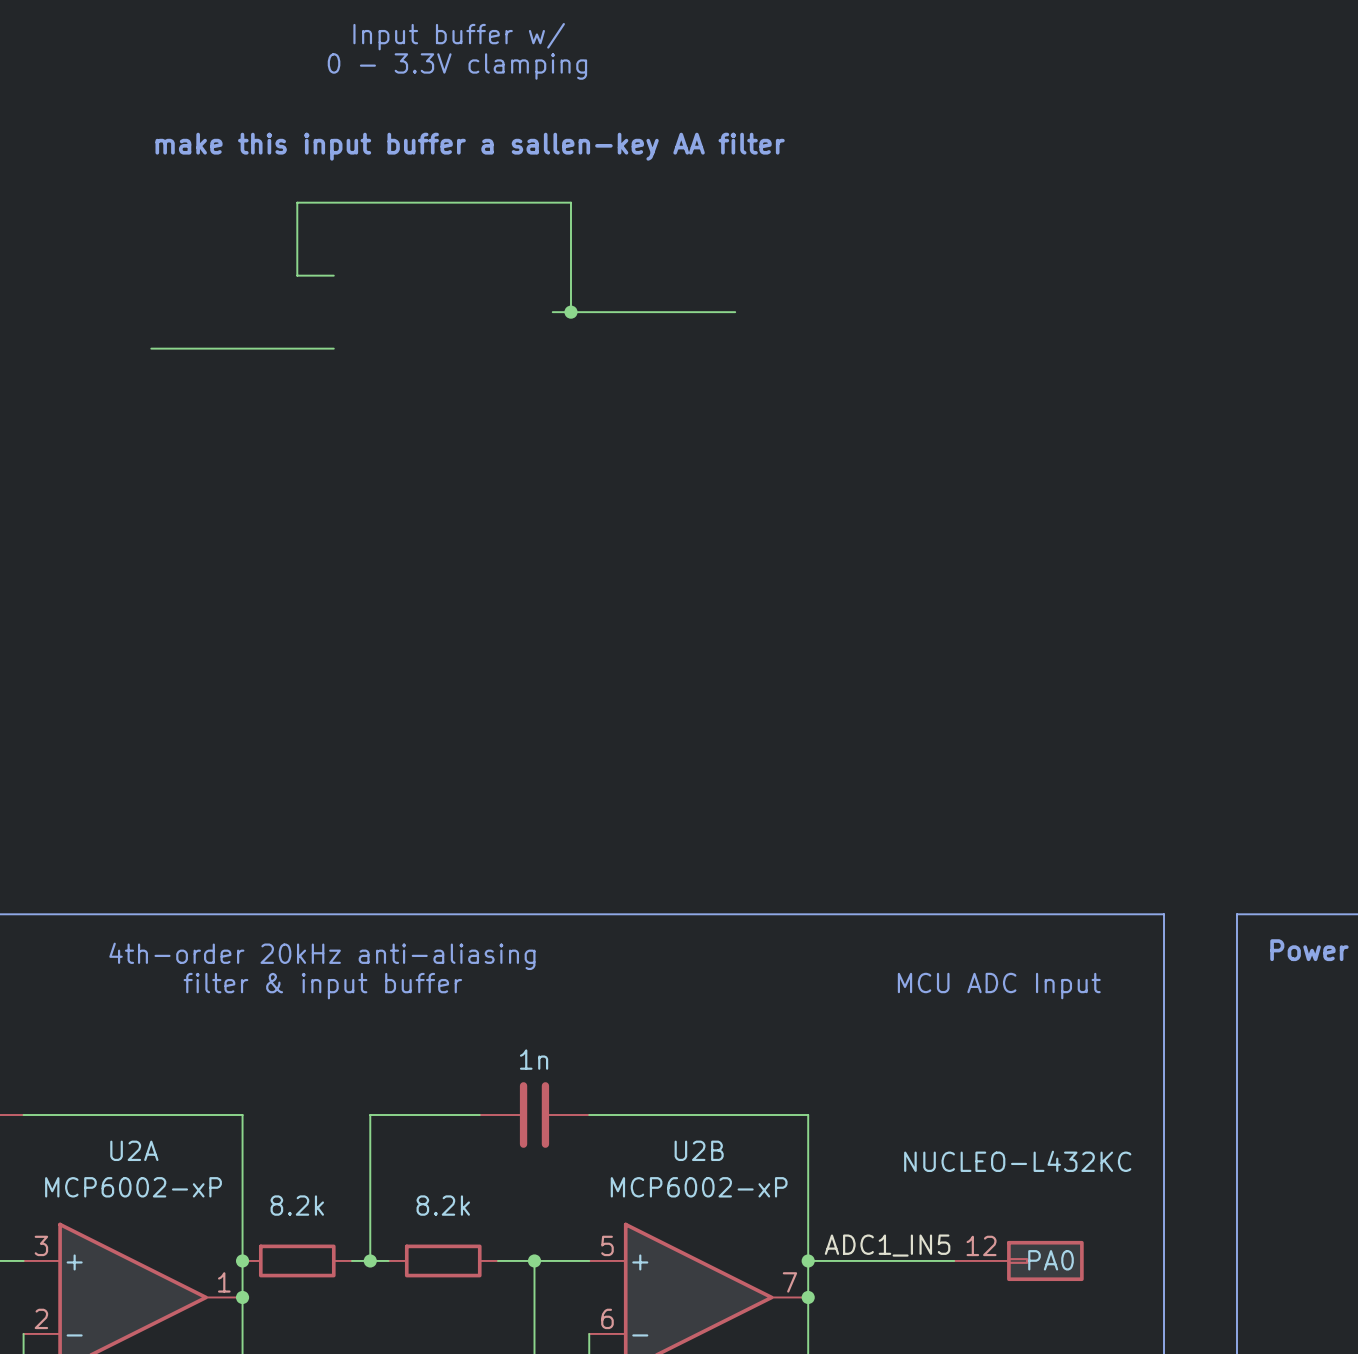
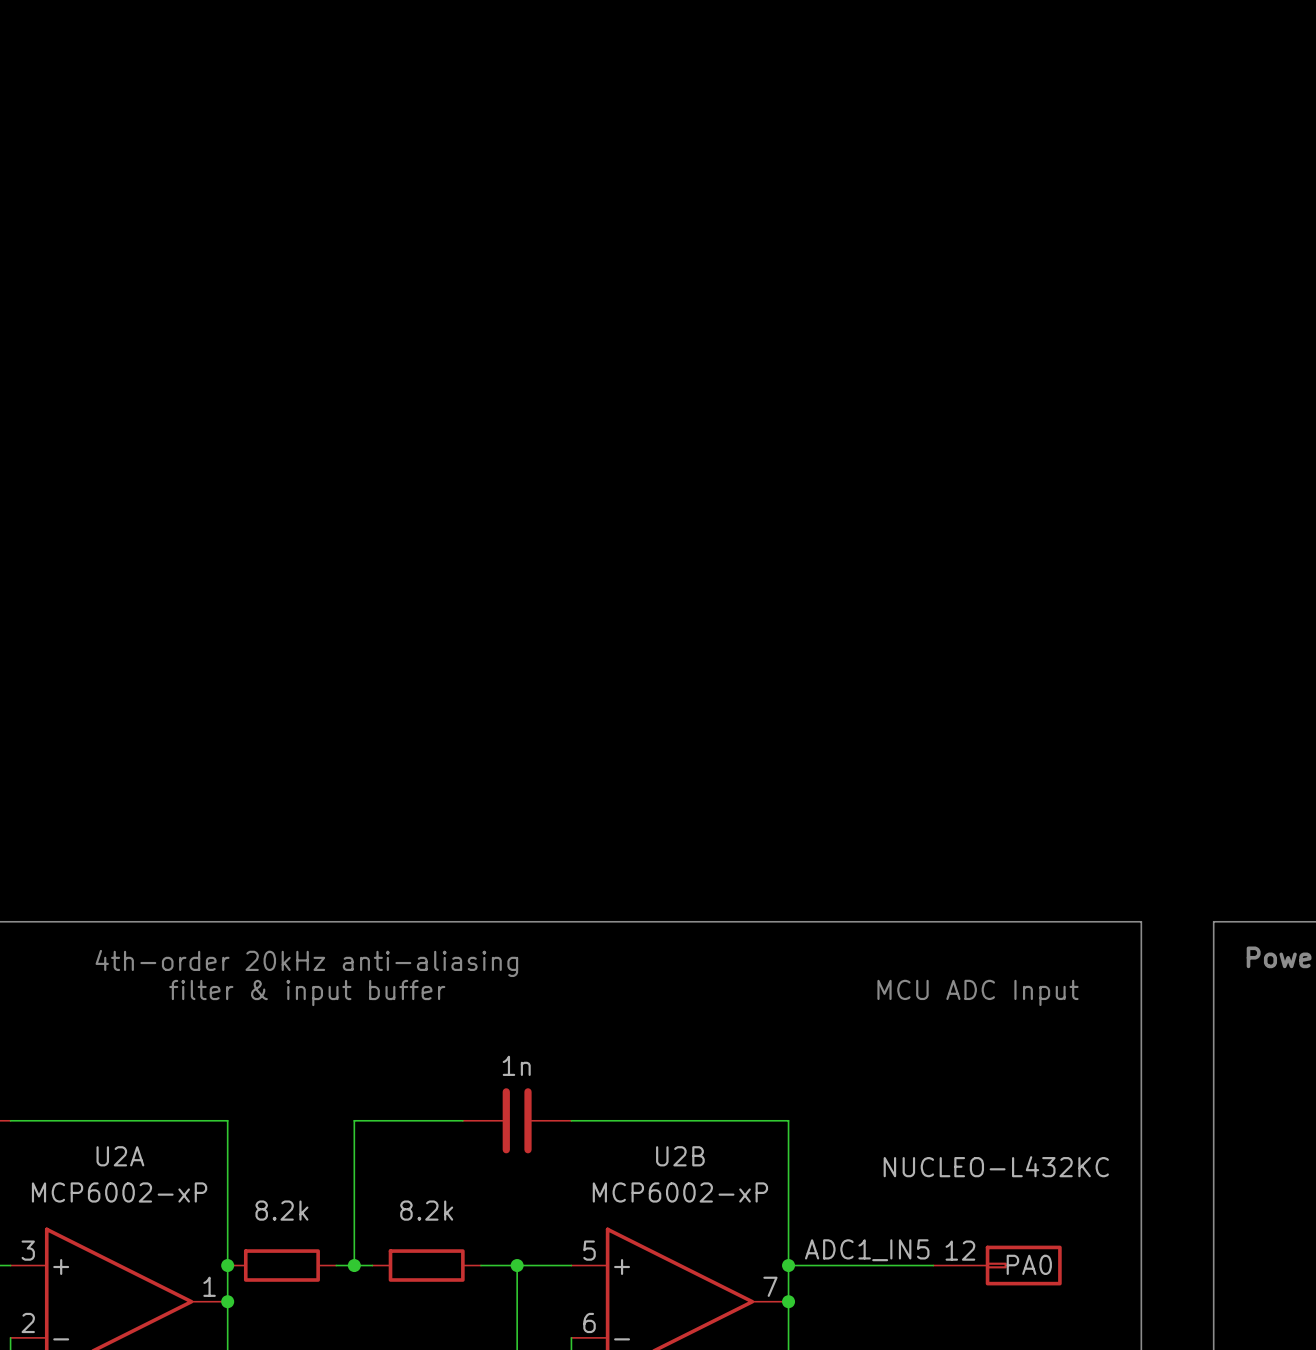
text: Input buffer w/ (459, 36) -> none
text: 0 - 3.3V clamping (457, 66) -> none
text: make this input buffer a sallen-key AA filter (470, 146) -> none
wire: (333, 275) (297, 275) (297, 202) (570, 202) (570, 312) -> none
wire: (552, 312) (735, 312) -> none
junction: (570, 312) -> none
wire: (151, 348) (333, 348) -> none

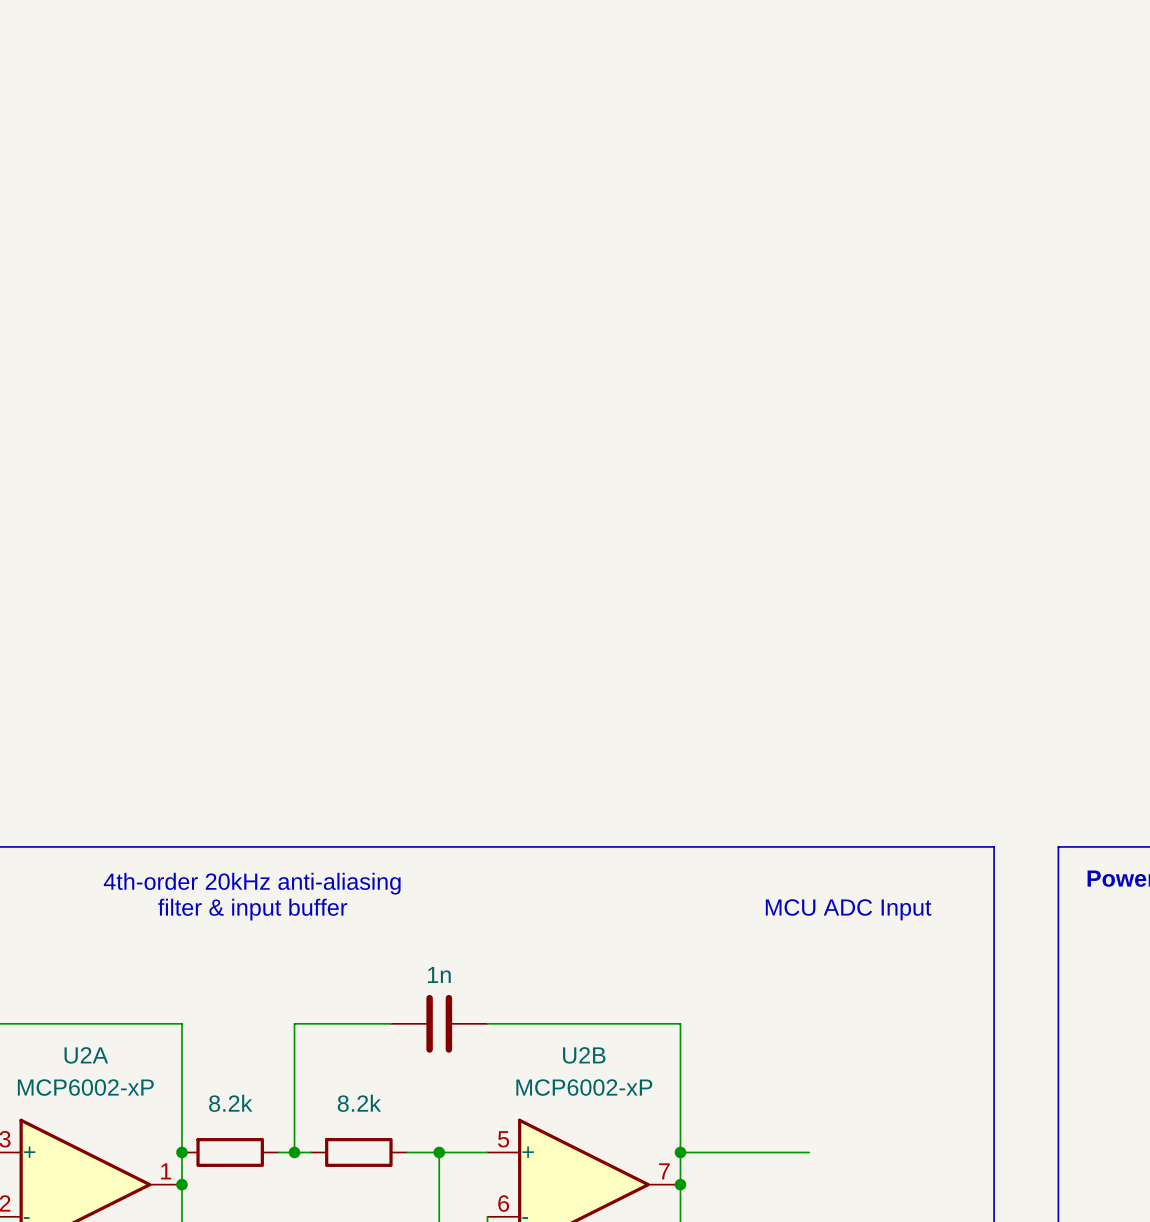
label: ADC1_IN5 (867, 1250) -> none
part: NUCLEO-L432KC (997, 1265) -> none

